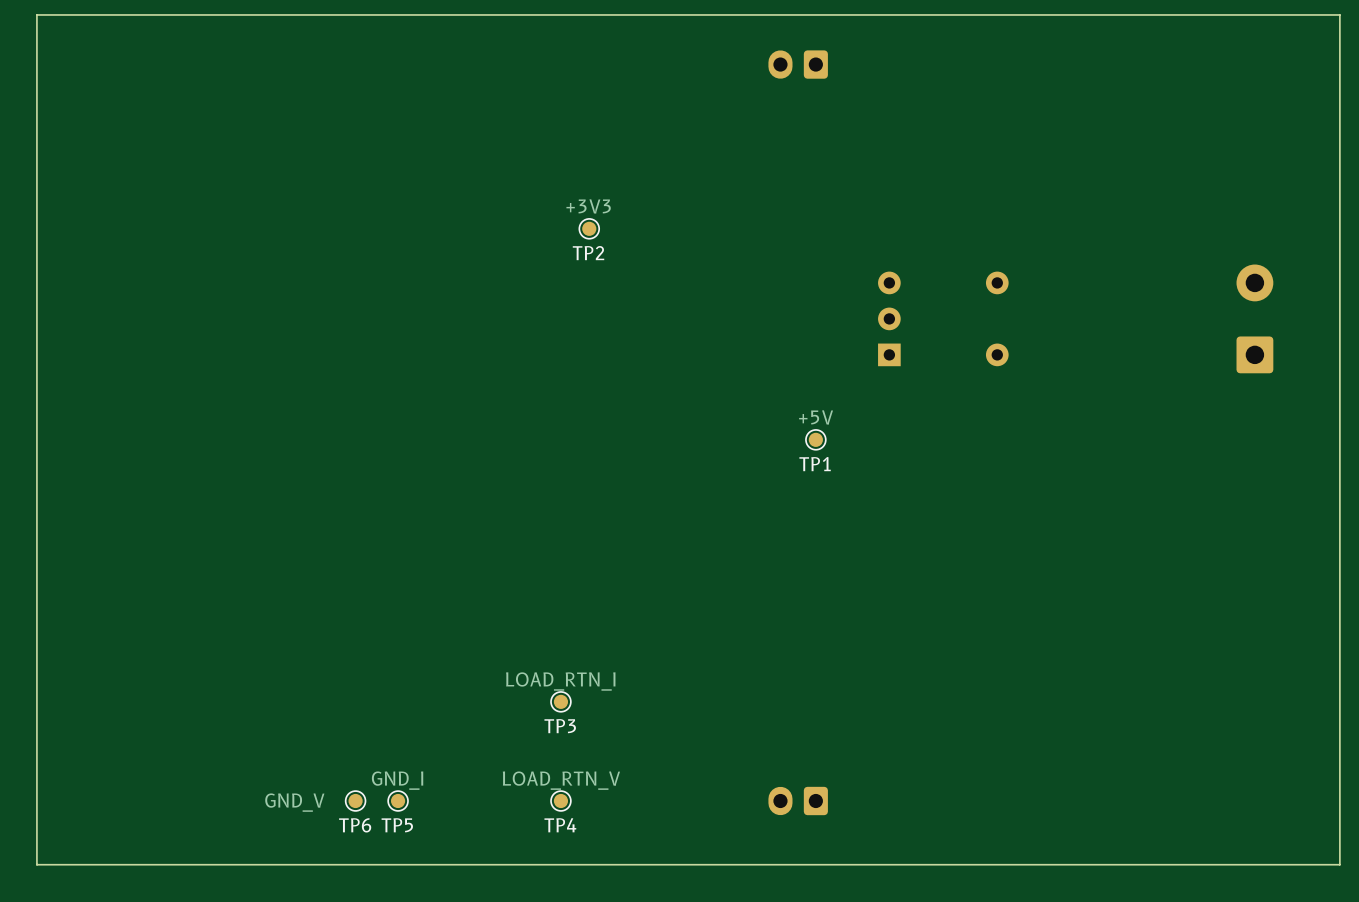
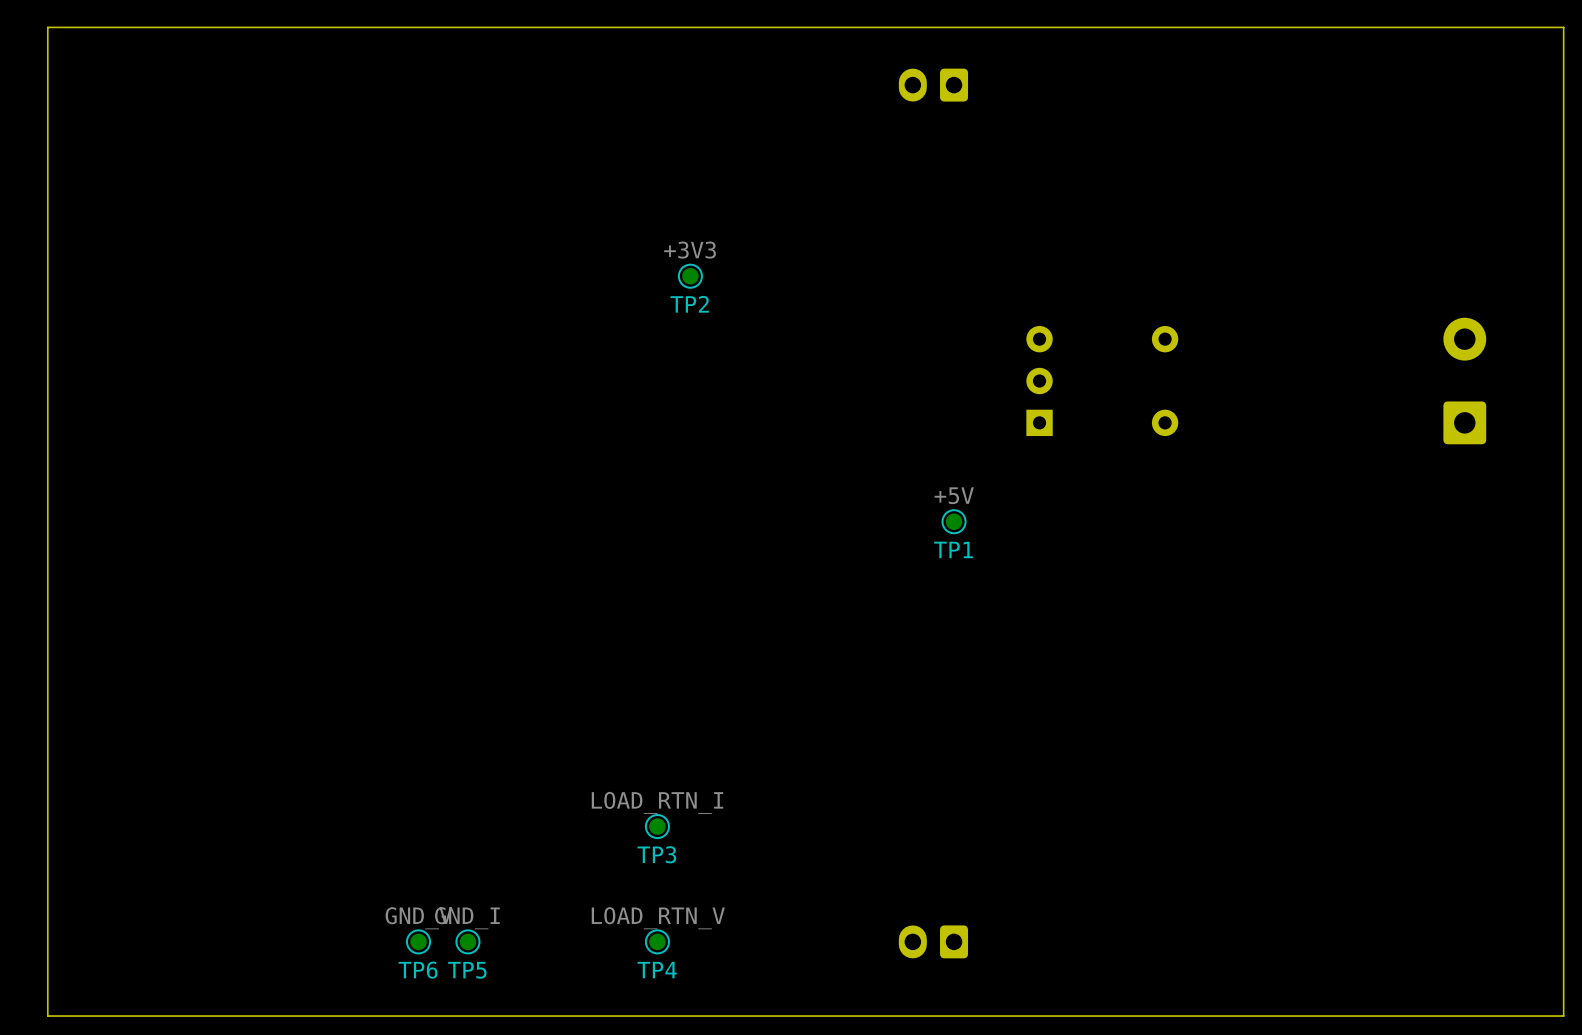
TP6 value position: GND_V (294, 802) -> GND_V (418, 918)

